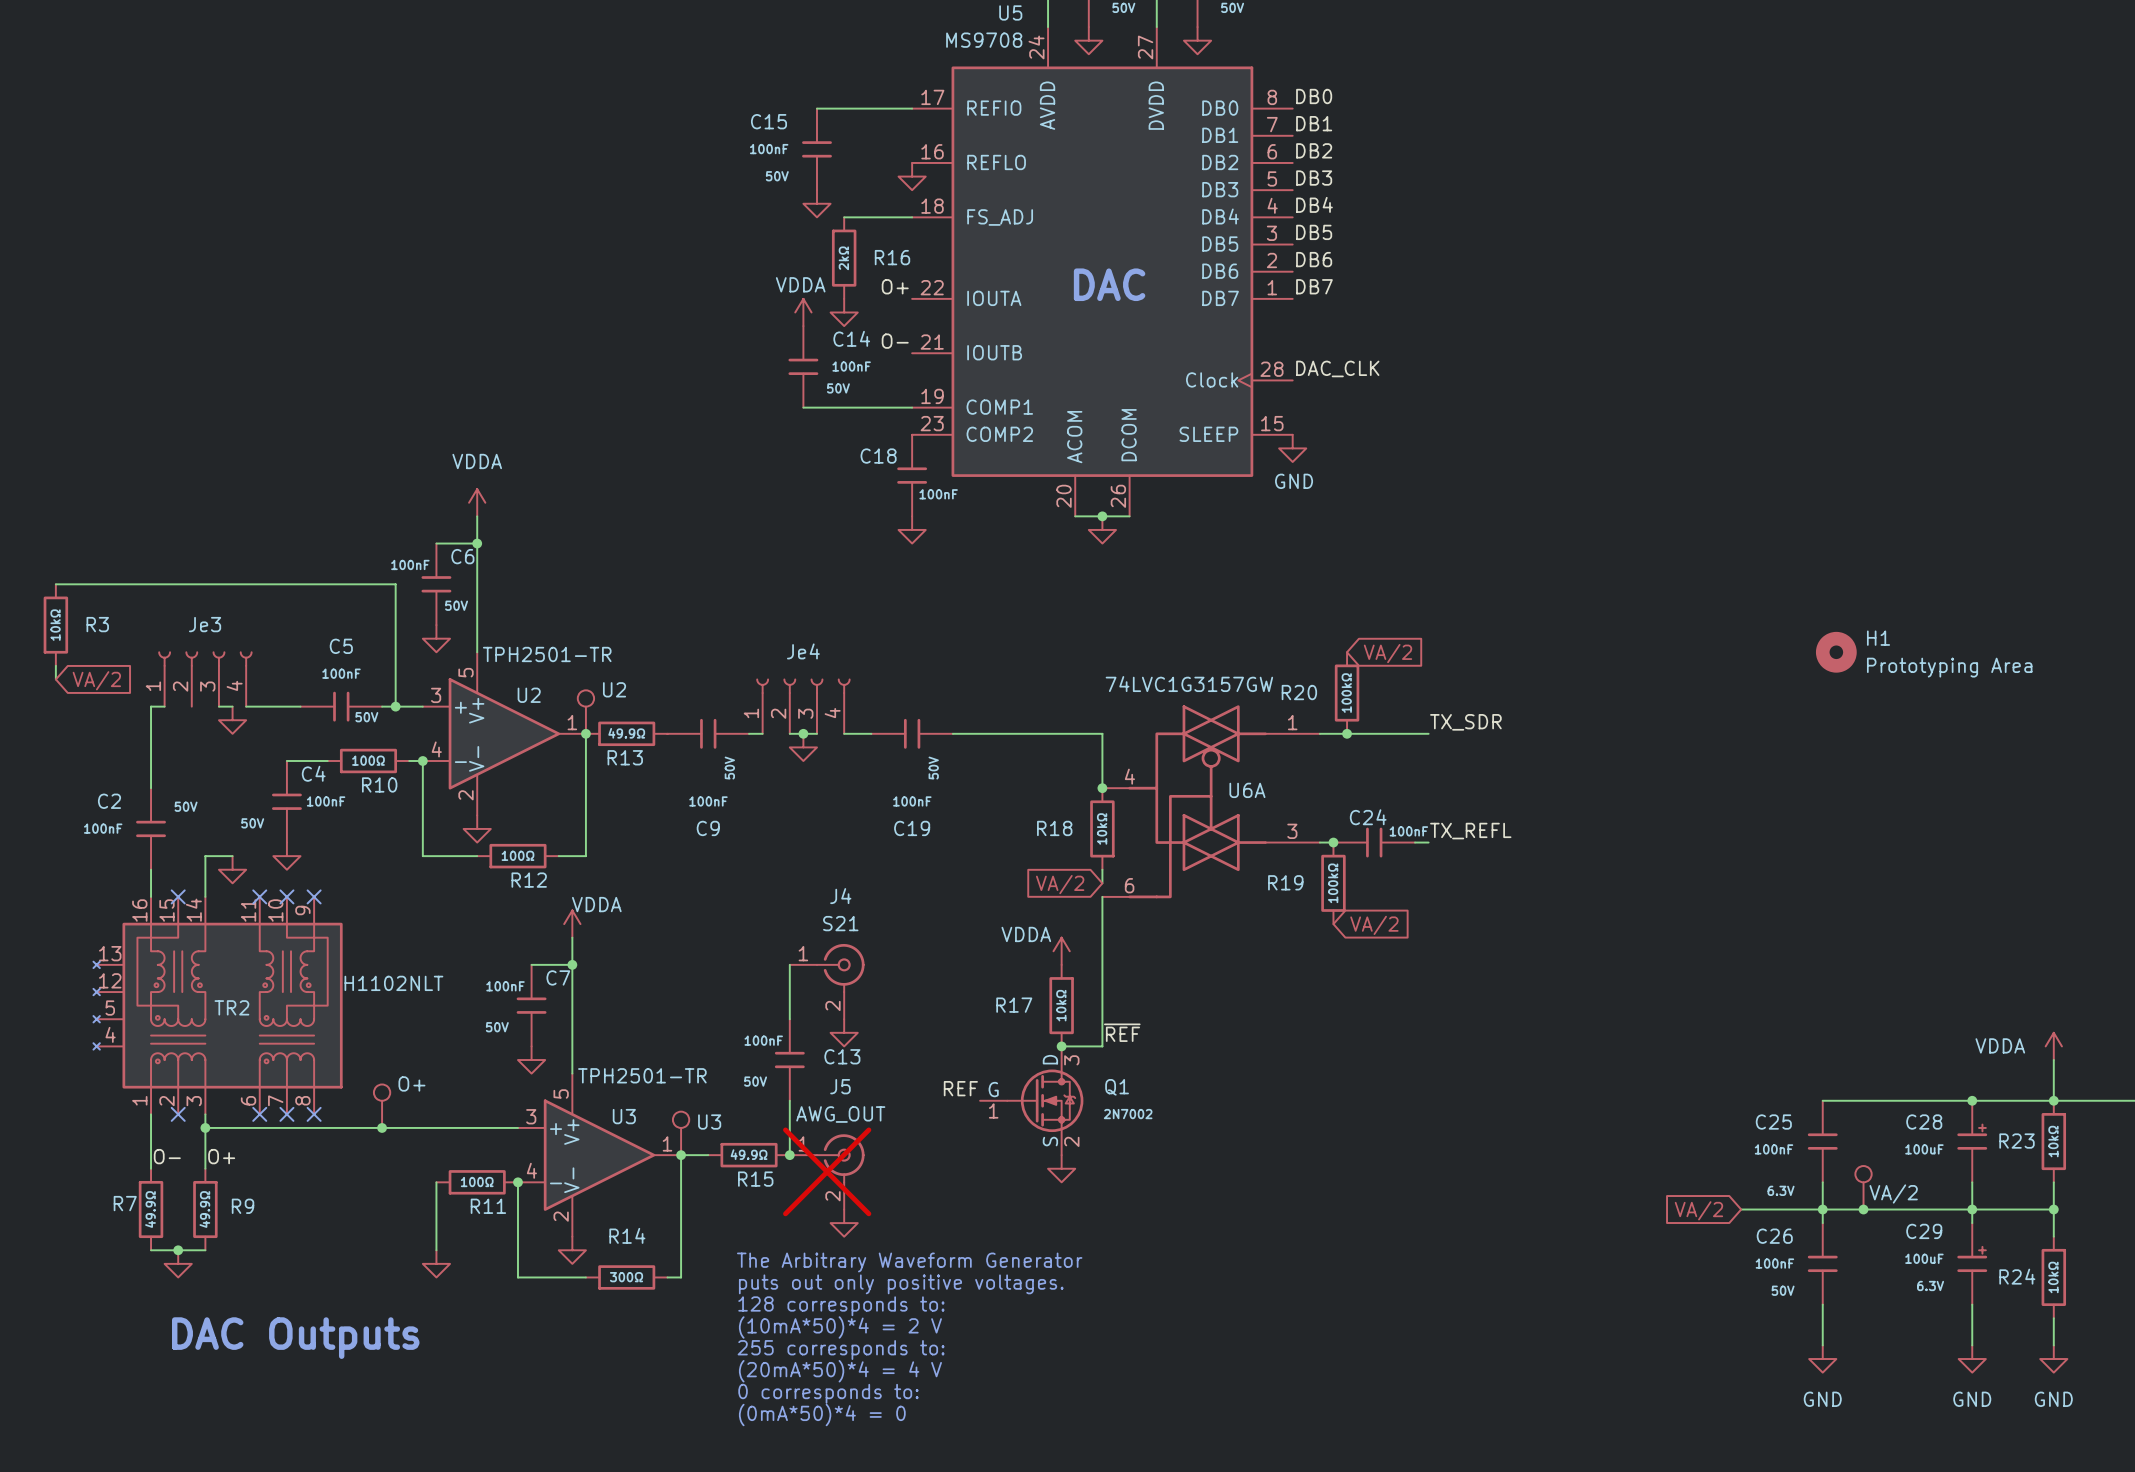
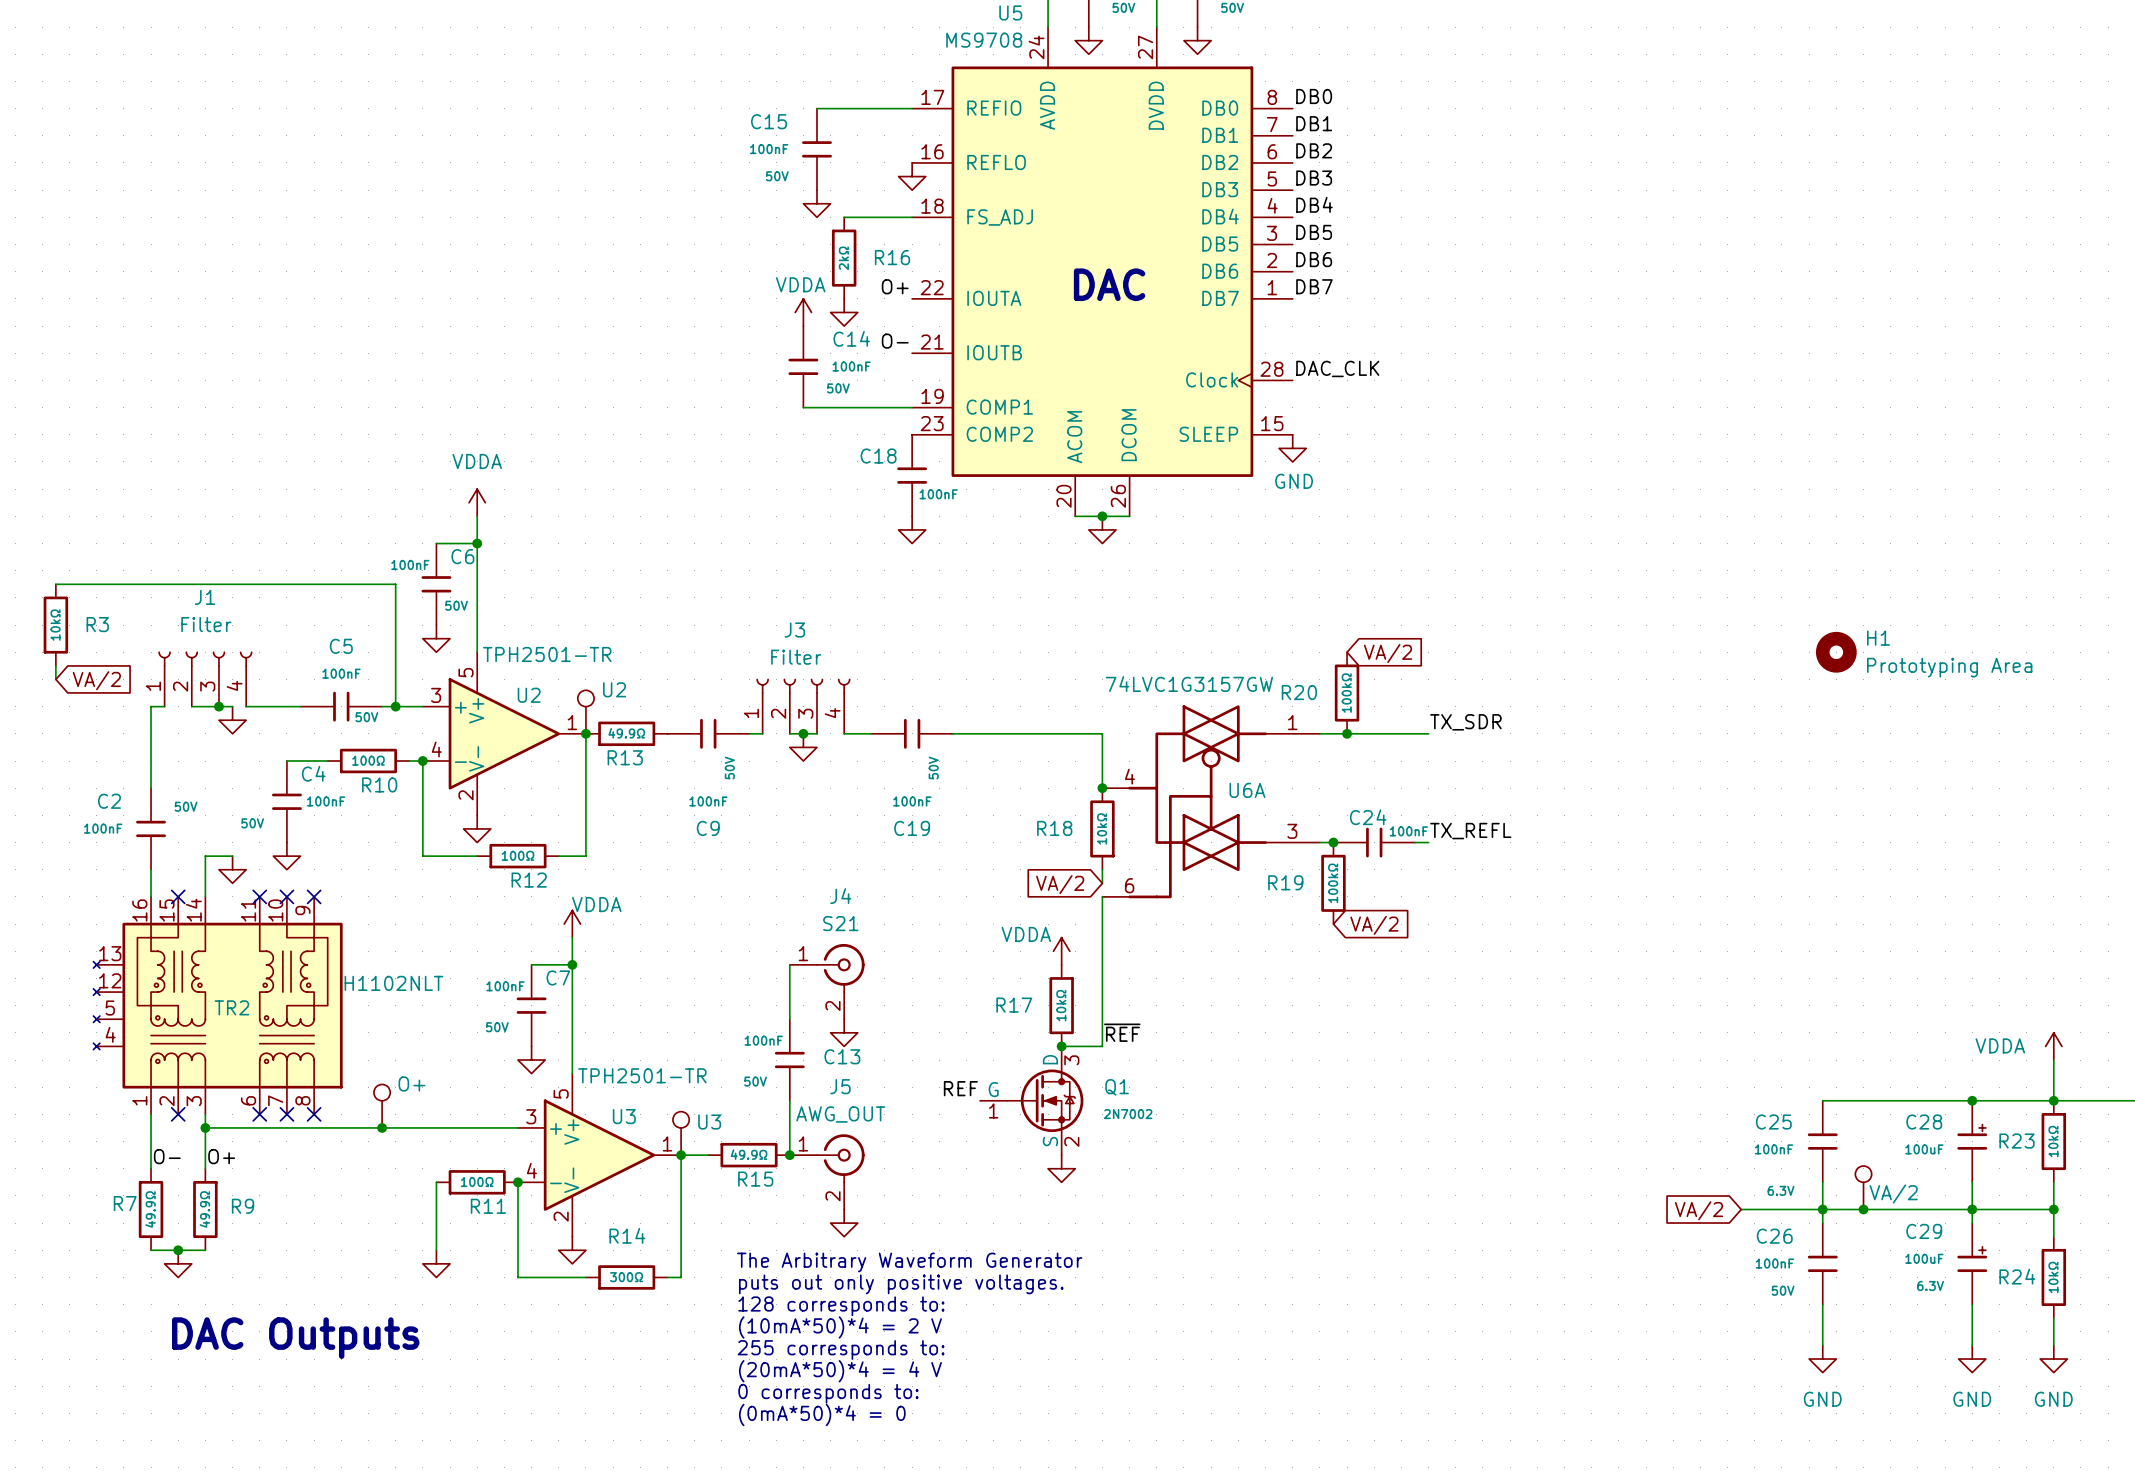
Je3 name: Je3 (205, 624) -> J1 (205, 597)
Je3 value: none -> Filter (206, 624)
Je4 name: Je4 (803, 651) -> J3 (794, 630)
Je4 value: none -> Filter (796, 657)
wire: none -> (191, 706) (218, 706)
junction: none -> (218, 706)
J5 do-not-place cross: (827, 1171) -> none

